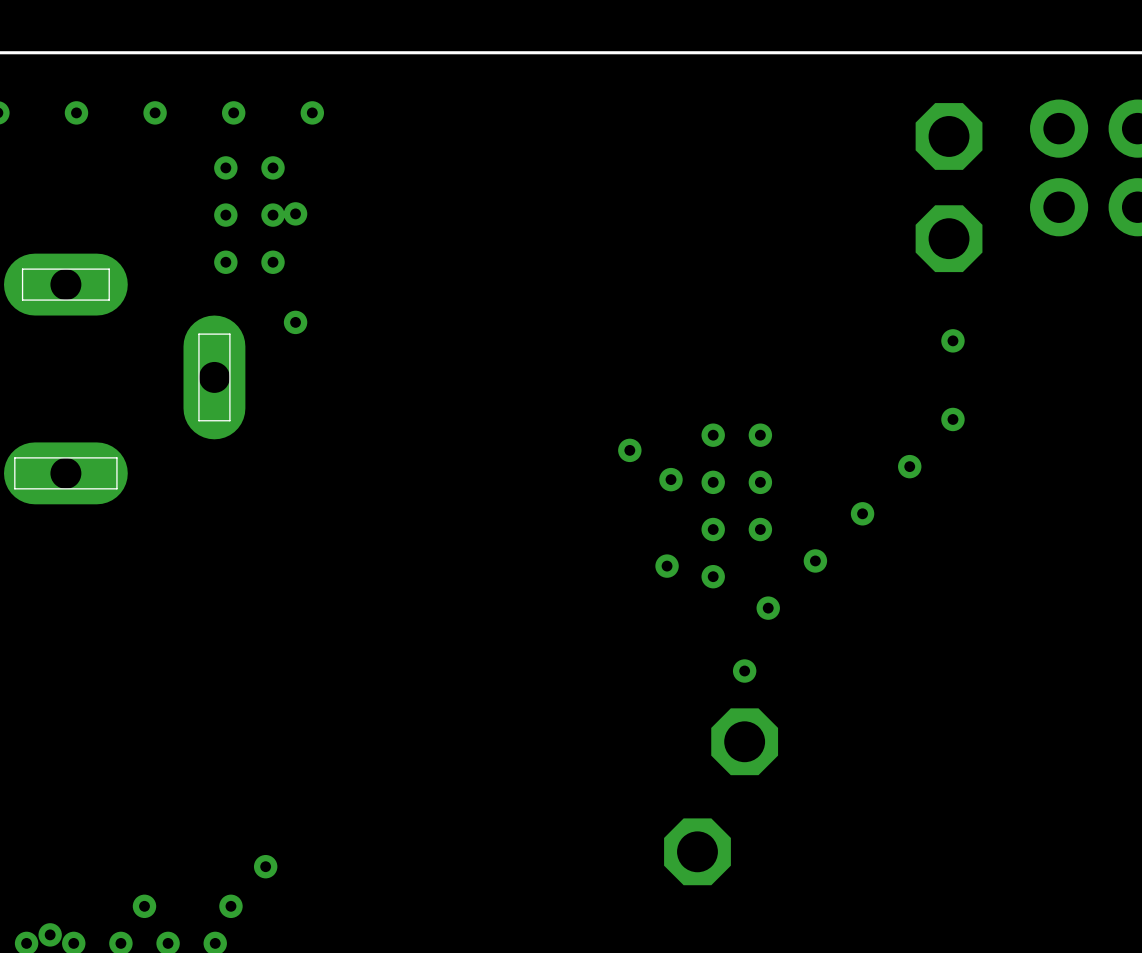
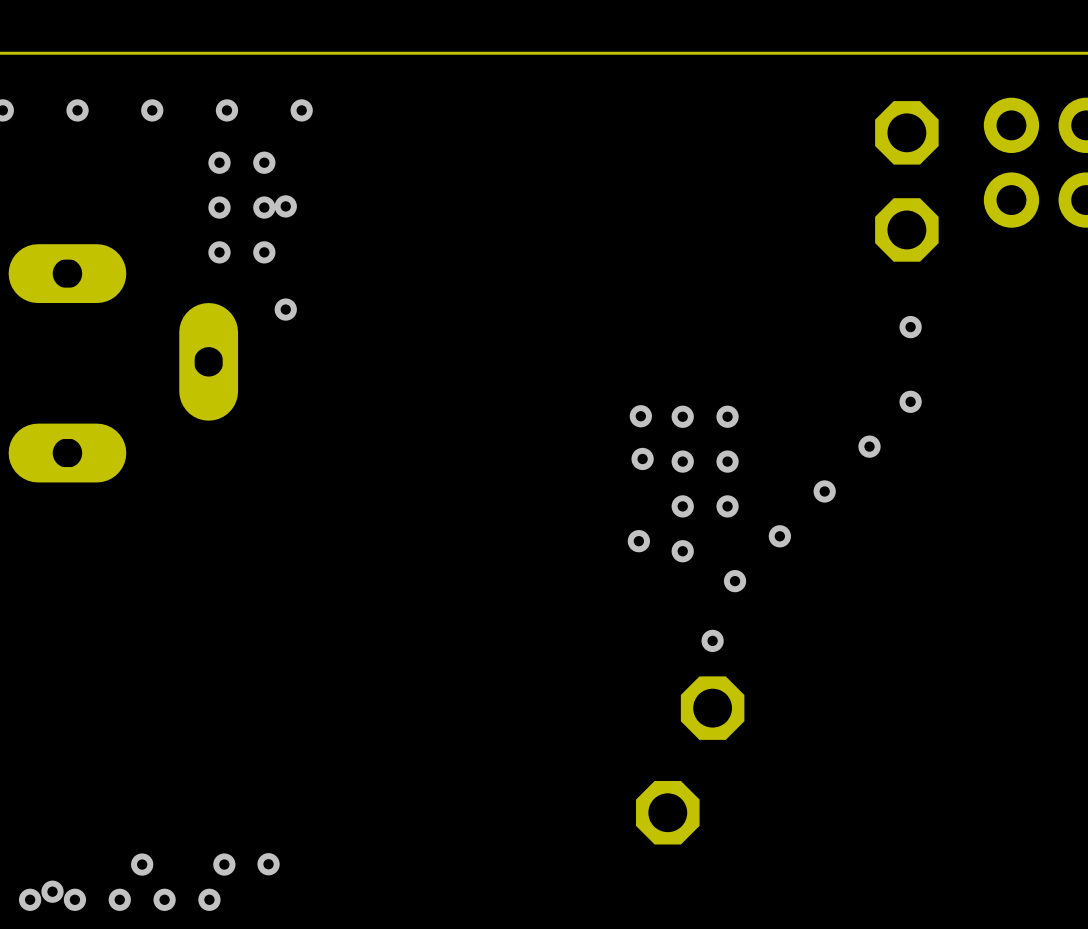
via position: (629, 450) -> (640, 416)
via position: (265, 866) -> (268, 864)

